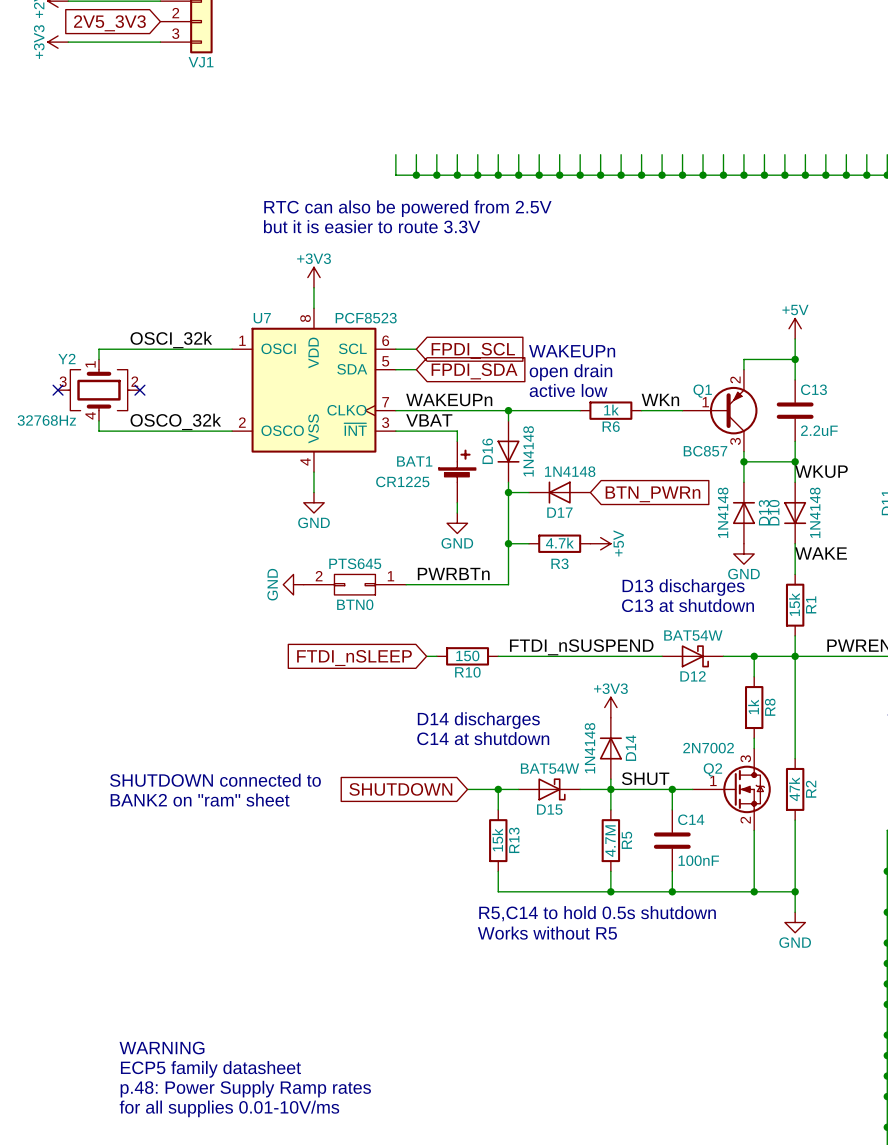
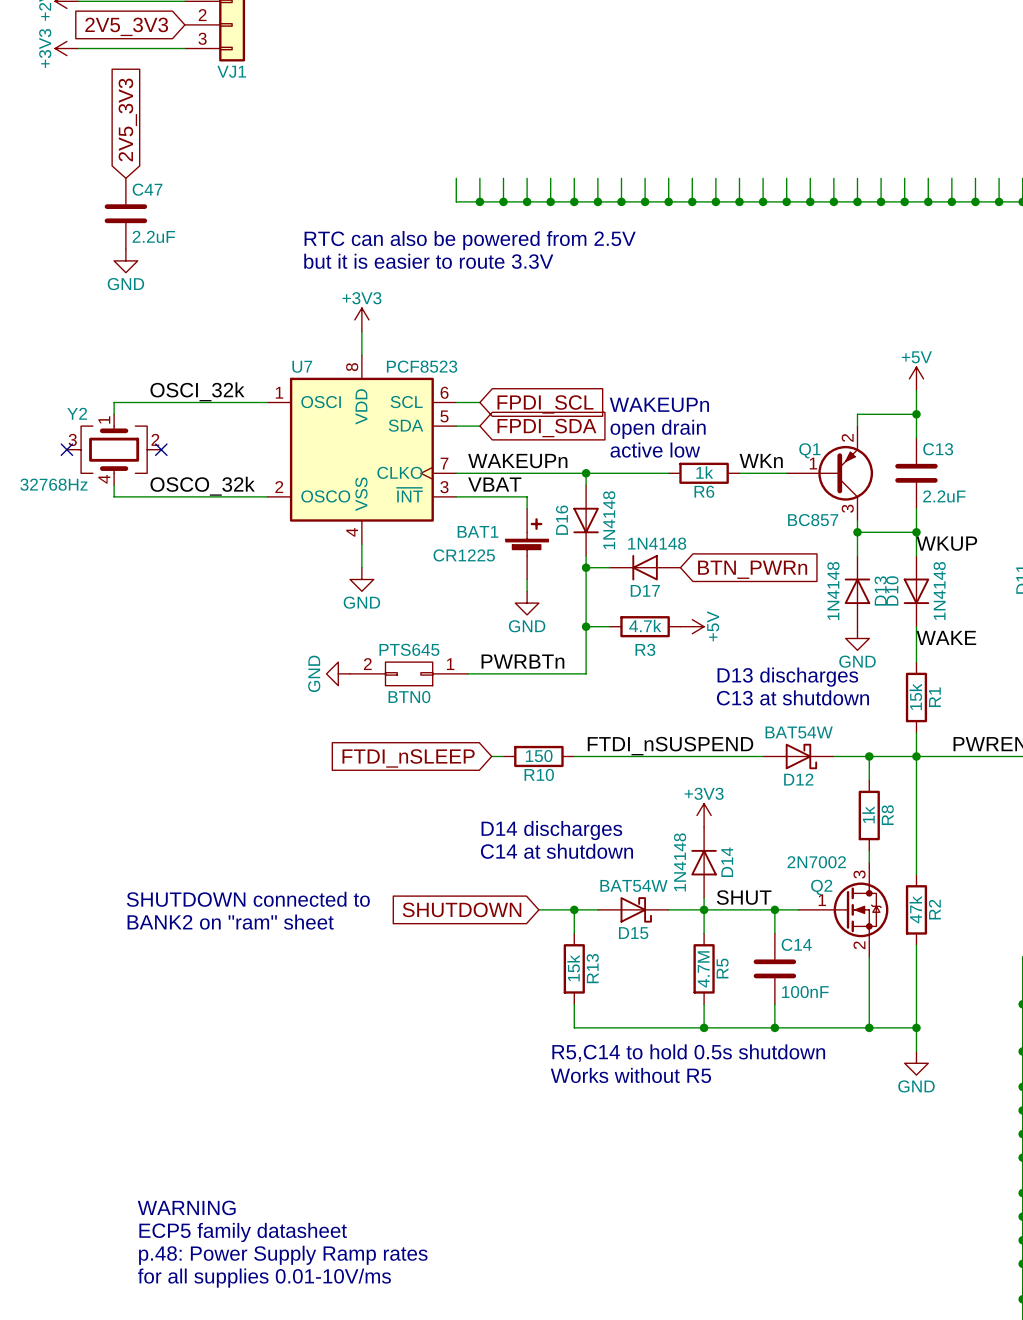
global label: none -> 2V5_3V3 (127, 119)
C47: none -> 2.2uF (125, 213)
power symbol: none -> GND (125, 260)

